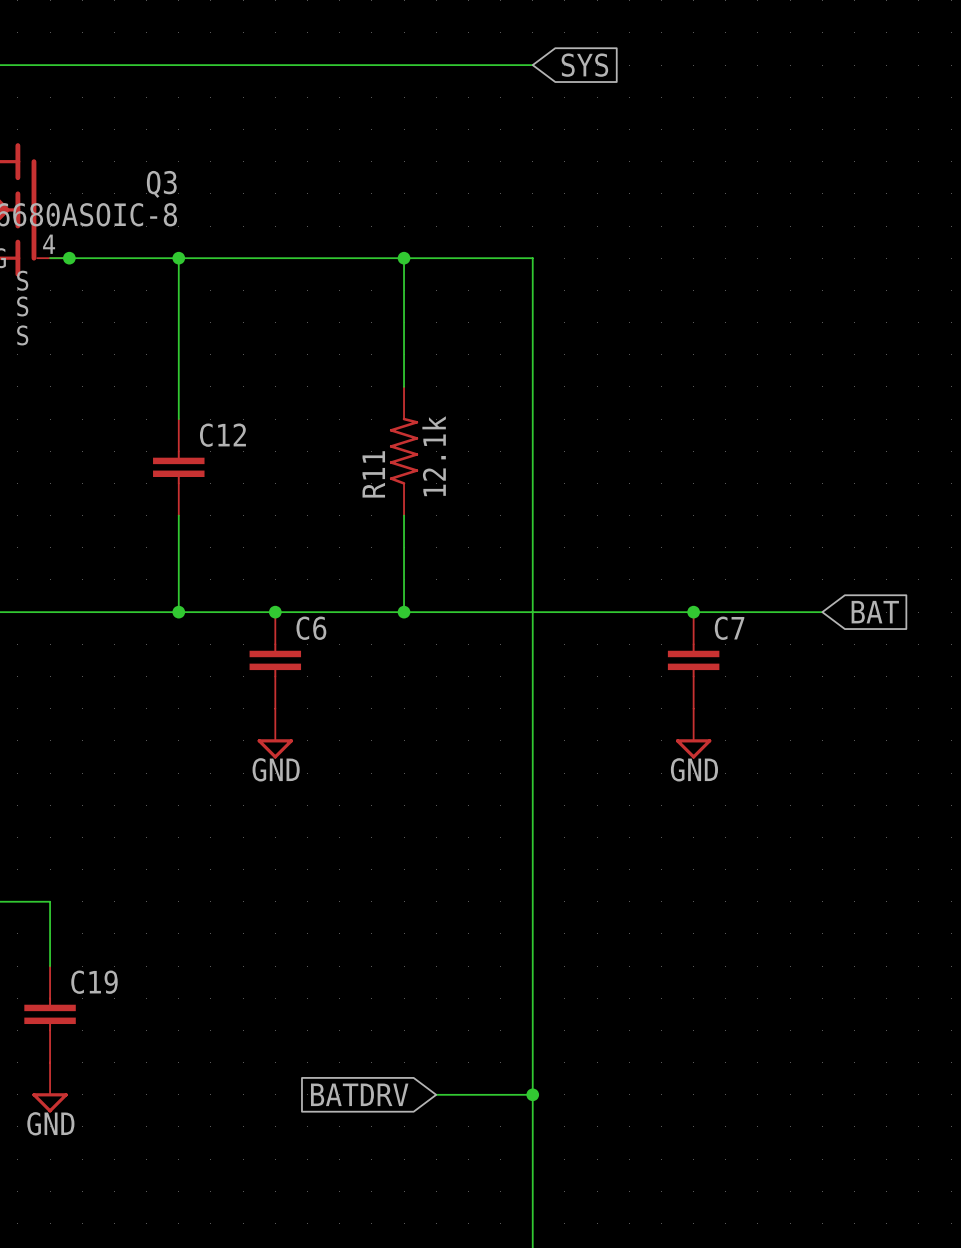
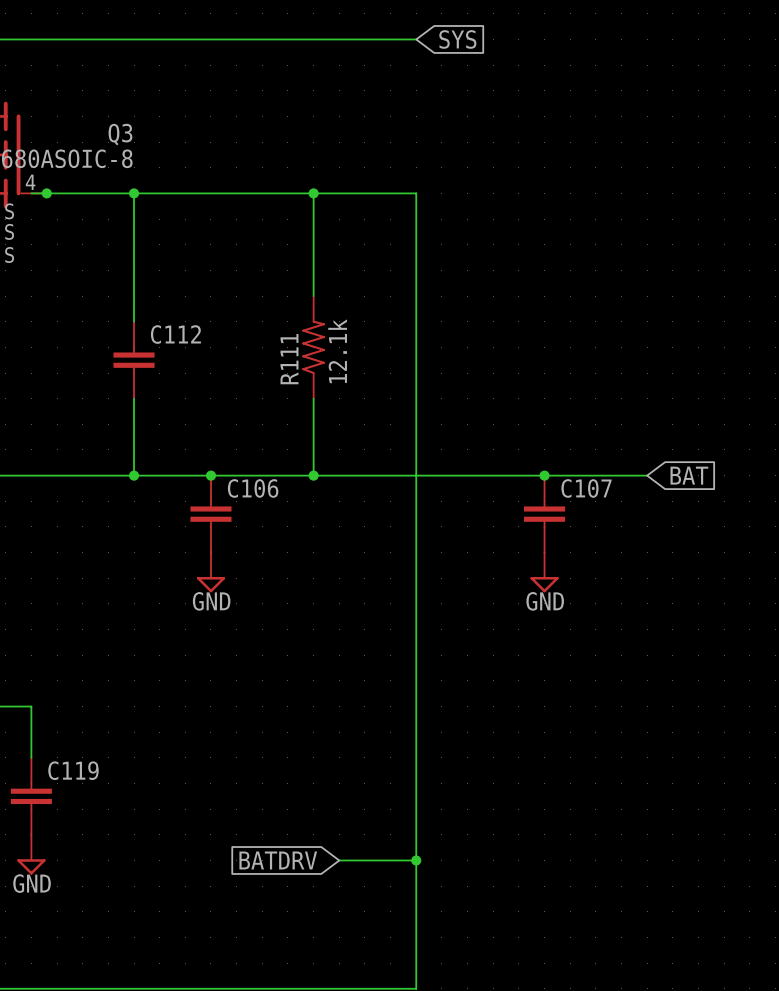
C12 name: C12 (222, 435) -> C112 (175, 334)
R11 name: R11 (373, 474) -> R111 (289, 359)
C6 name: C6 (311, 628) -> C106 (253, 488)
C7 name: C7 (729, 628) -> C107 (586, 488)
C19 name: C19 (94, 982) -> C119 (73, 770)

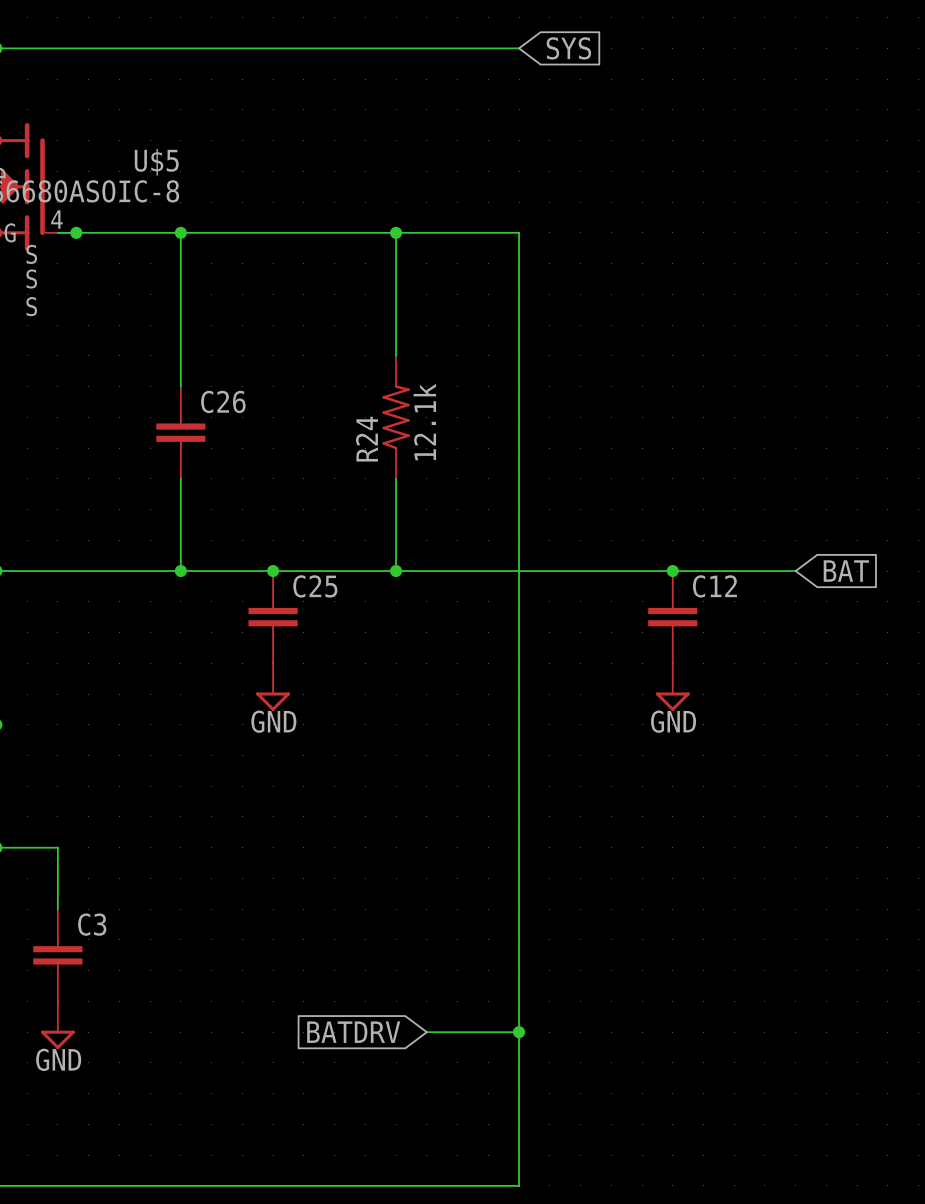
Q3 name: Q3 (120, 134) -> U$5 (156, 162)
C112 name: C112 (175, 334) -> C26 (223, 401)
R111 name: R111 (289, 359) -> R24 (366, 439)
C106 name: C106 (253, 488) -> C25 (315, 586)
C107 name: C107 (586, 488) -> C12 (714, 586)
C119 name: C119 (73, 770) -> C3 (92, 924)

